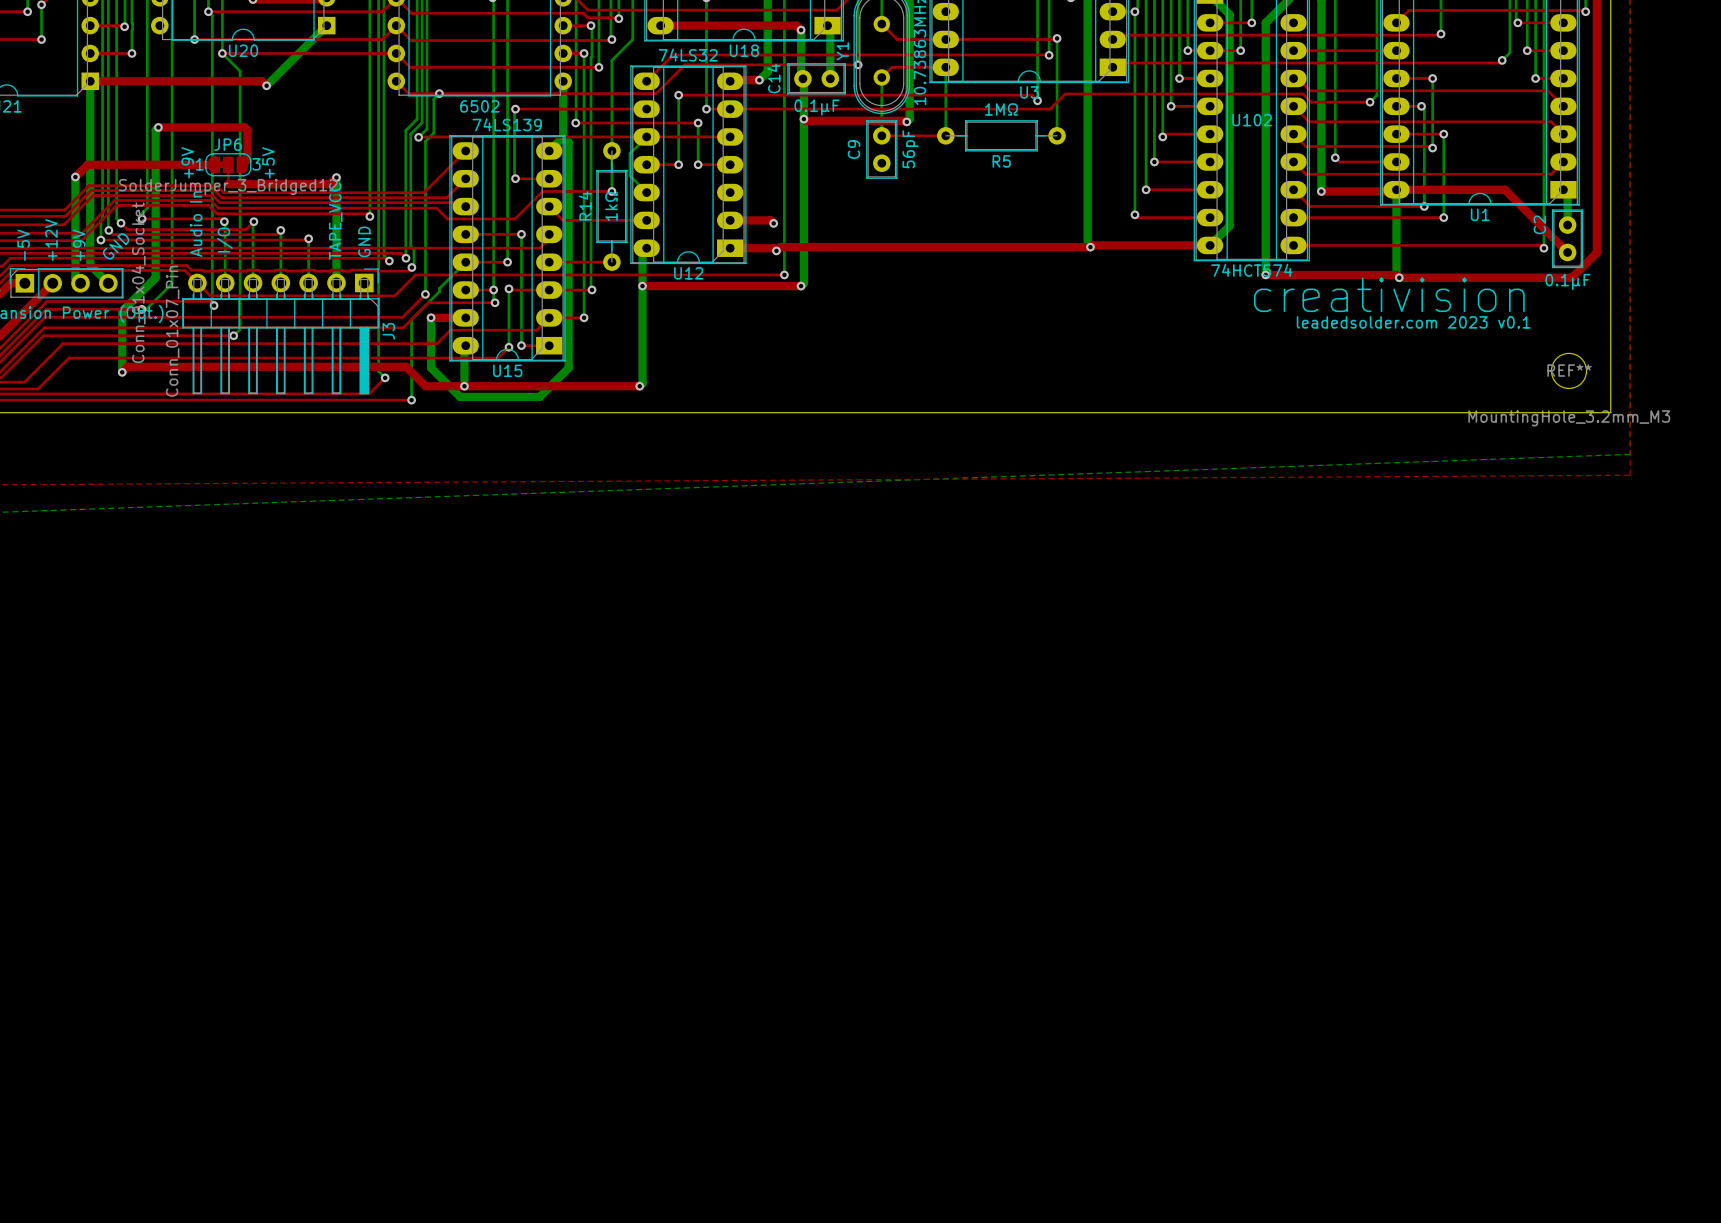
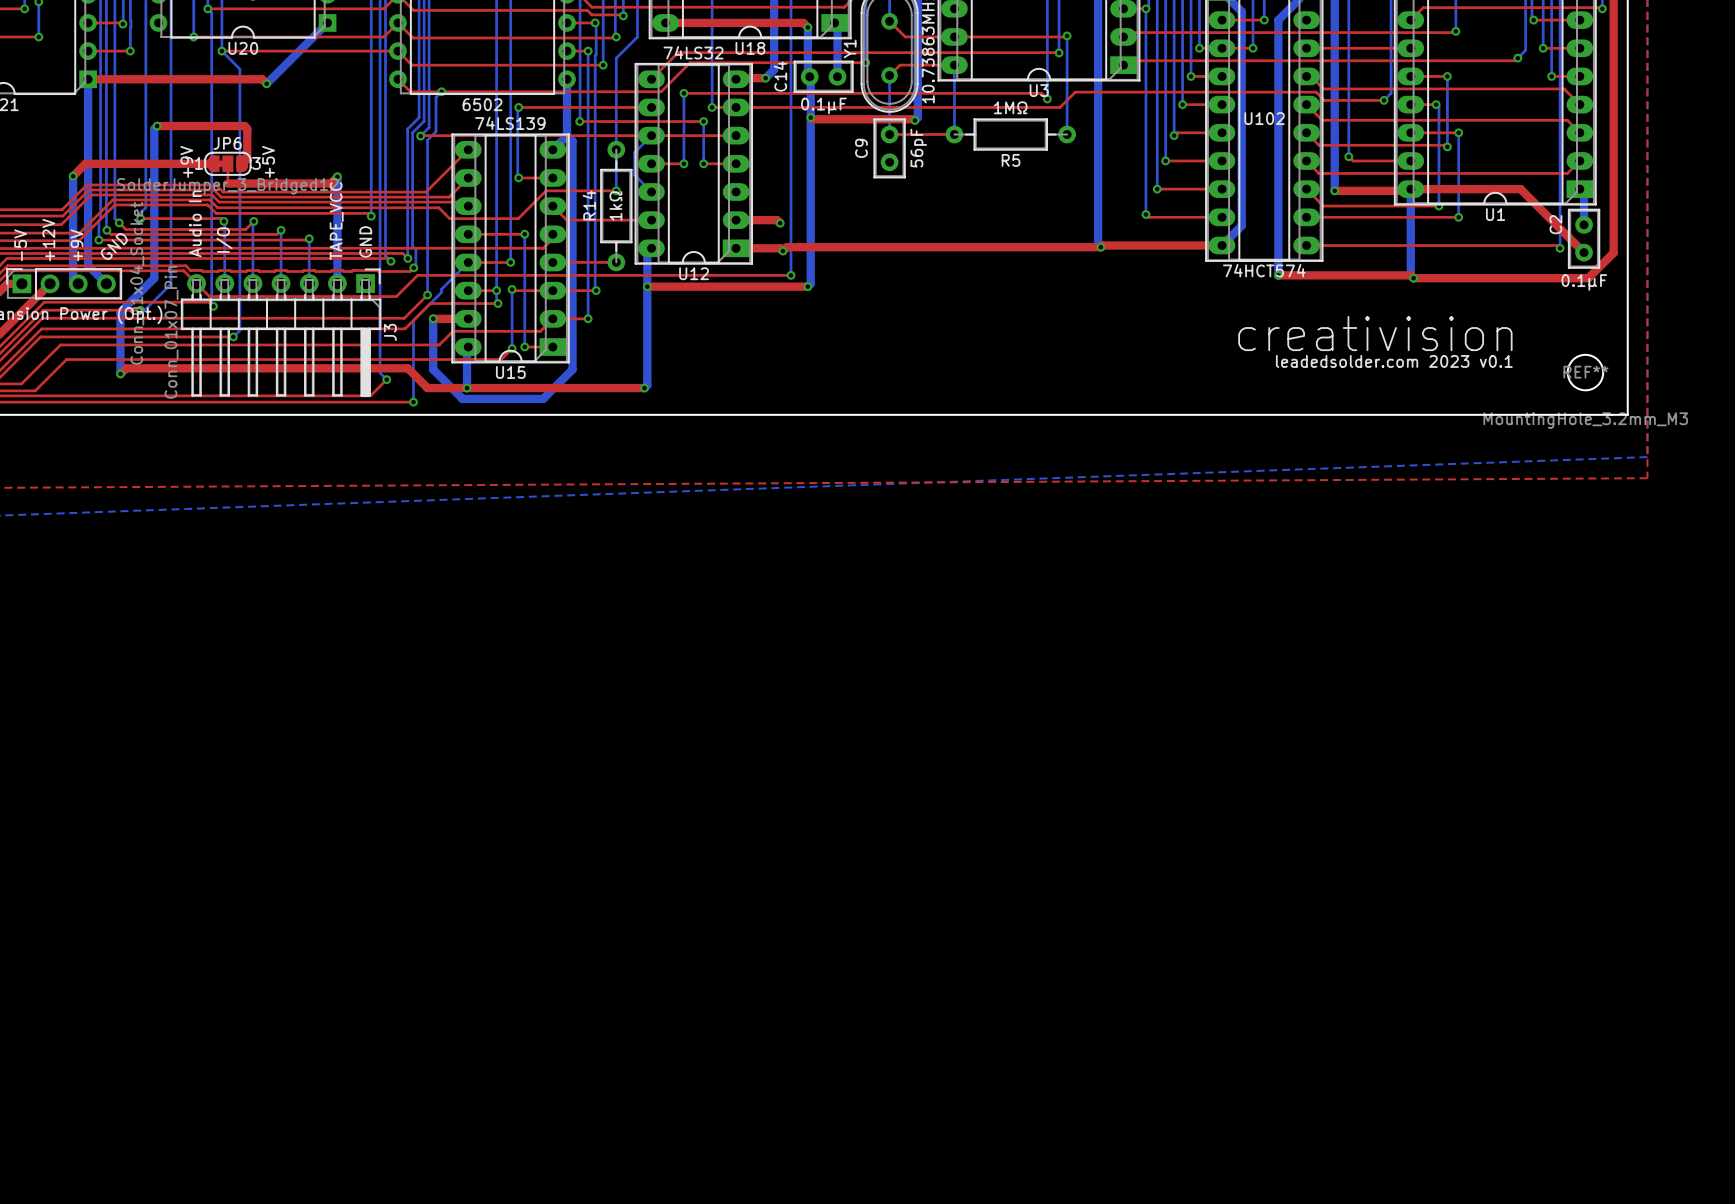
text position: creativision (1389, 294) -> creativision (1375, 333)
text position: leadedsolder.com 2023 v0.1 (1413, 322) -> leadedsolder.com 2023 v0.1 (1394, 361)

